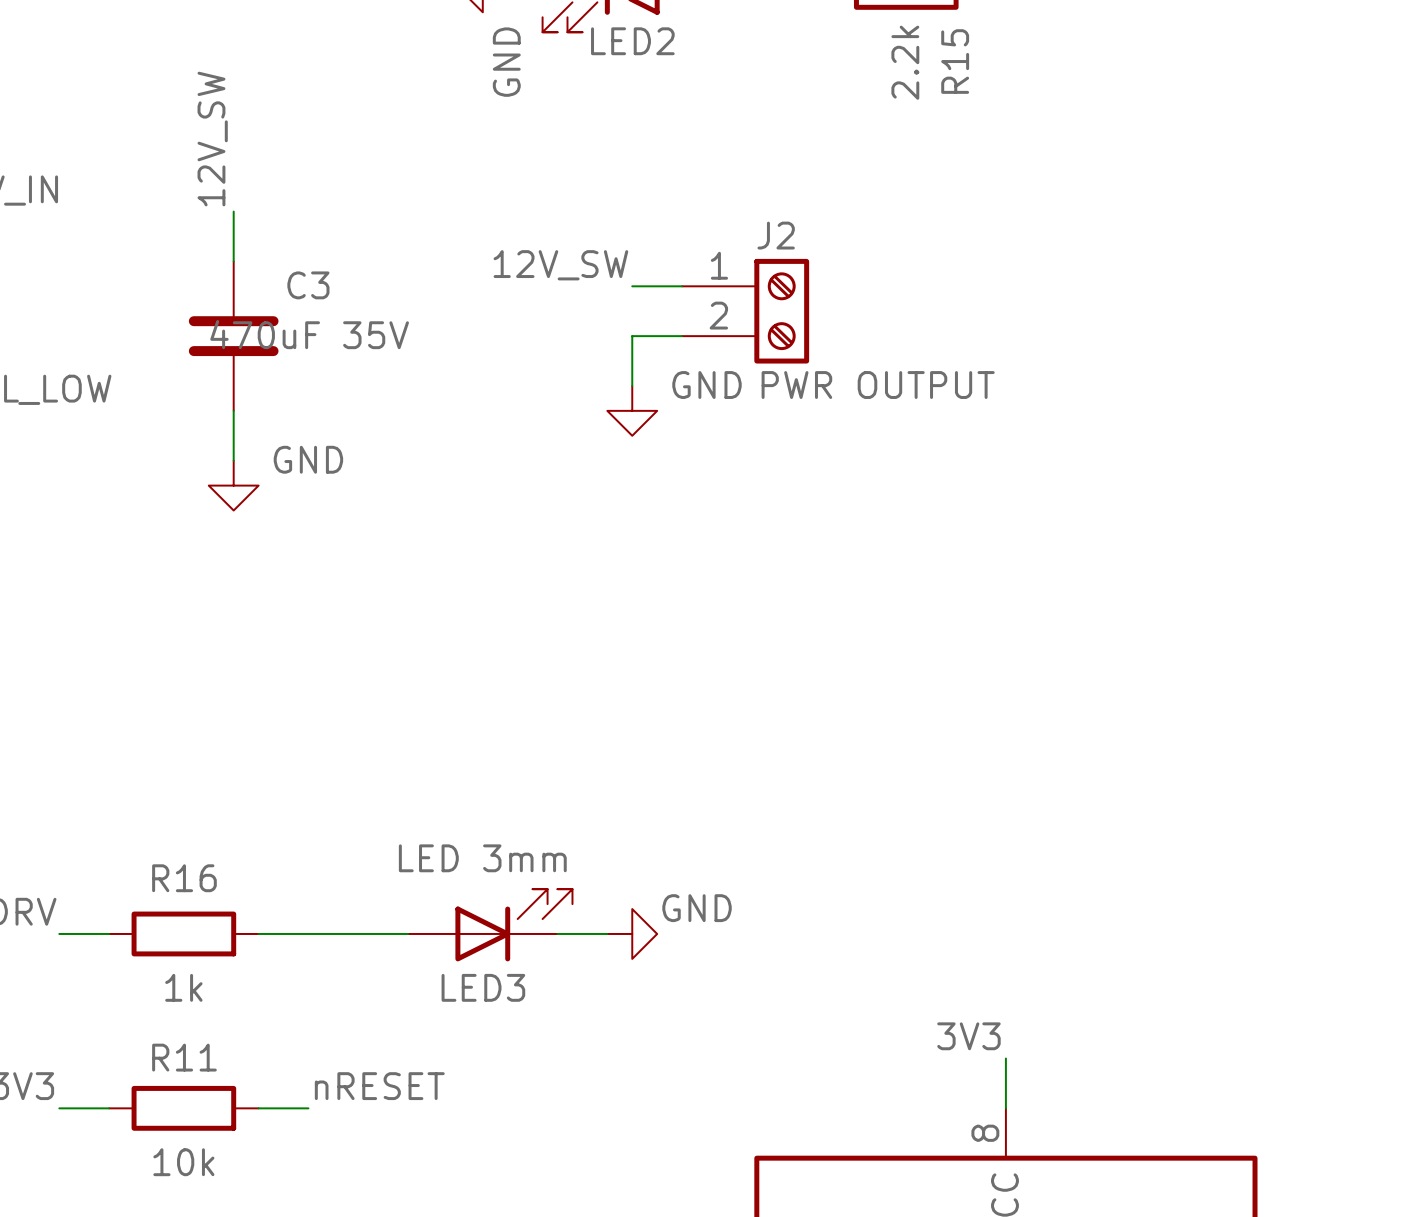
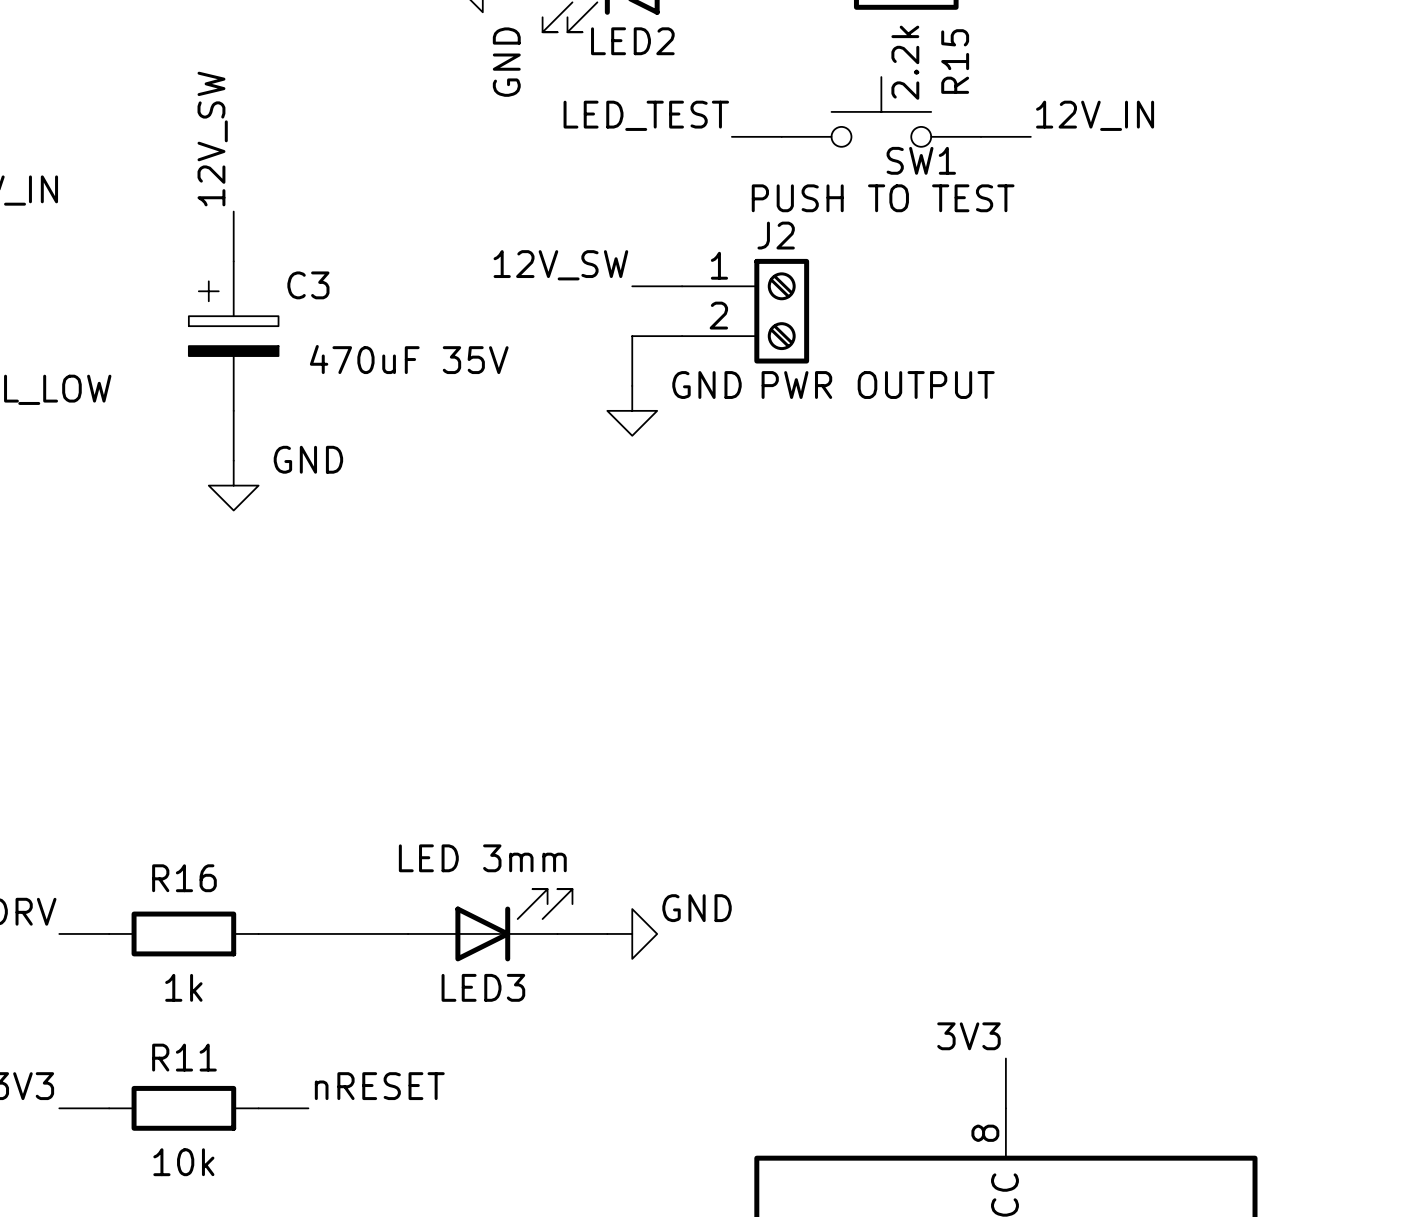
SW1: none -> PUSH TO TEST (881, 111)
label: none -> LED_TEST (646, 115)
label: none -> 12V_IN (1095, 115)
wire: none -> (731, 136) (781, 136)
wire: none -> (981, 136) (1030, 136)
C3 symbol: [188, 261, 279, 411] -> [188, 261, 279, 411]
C3 value position: 470uF 35V (309, 334) -> 470uF 35V (409, 359)

